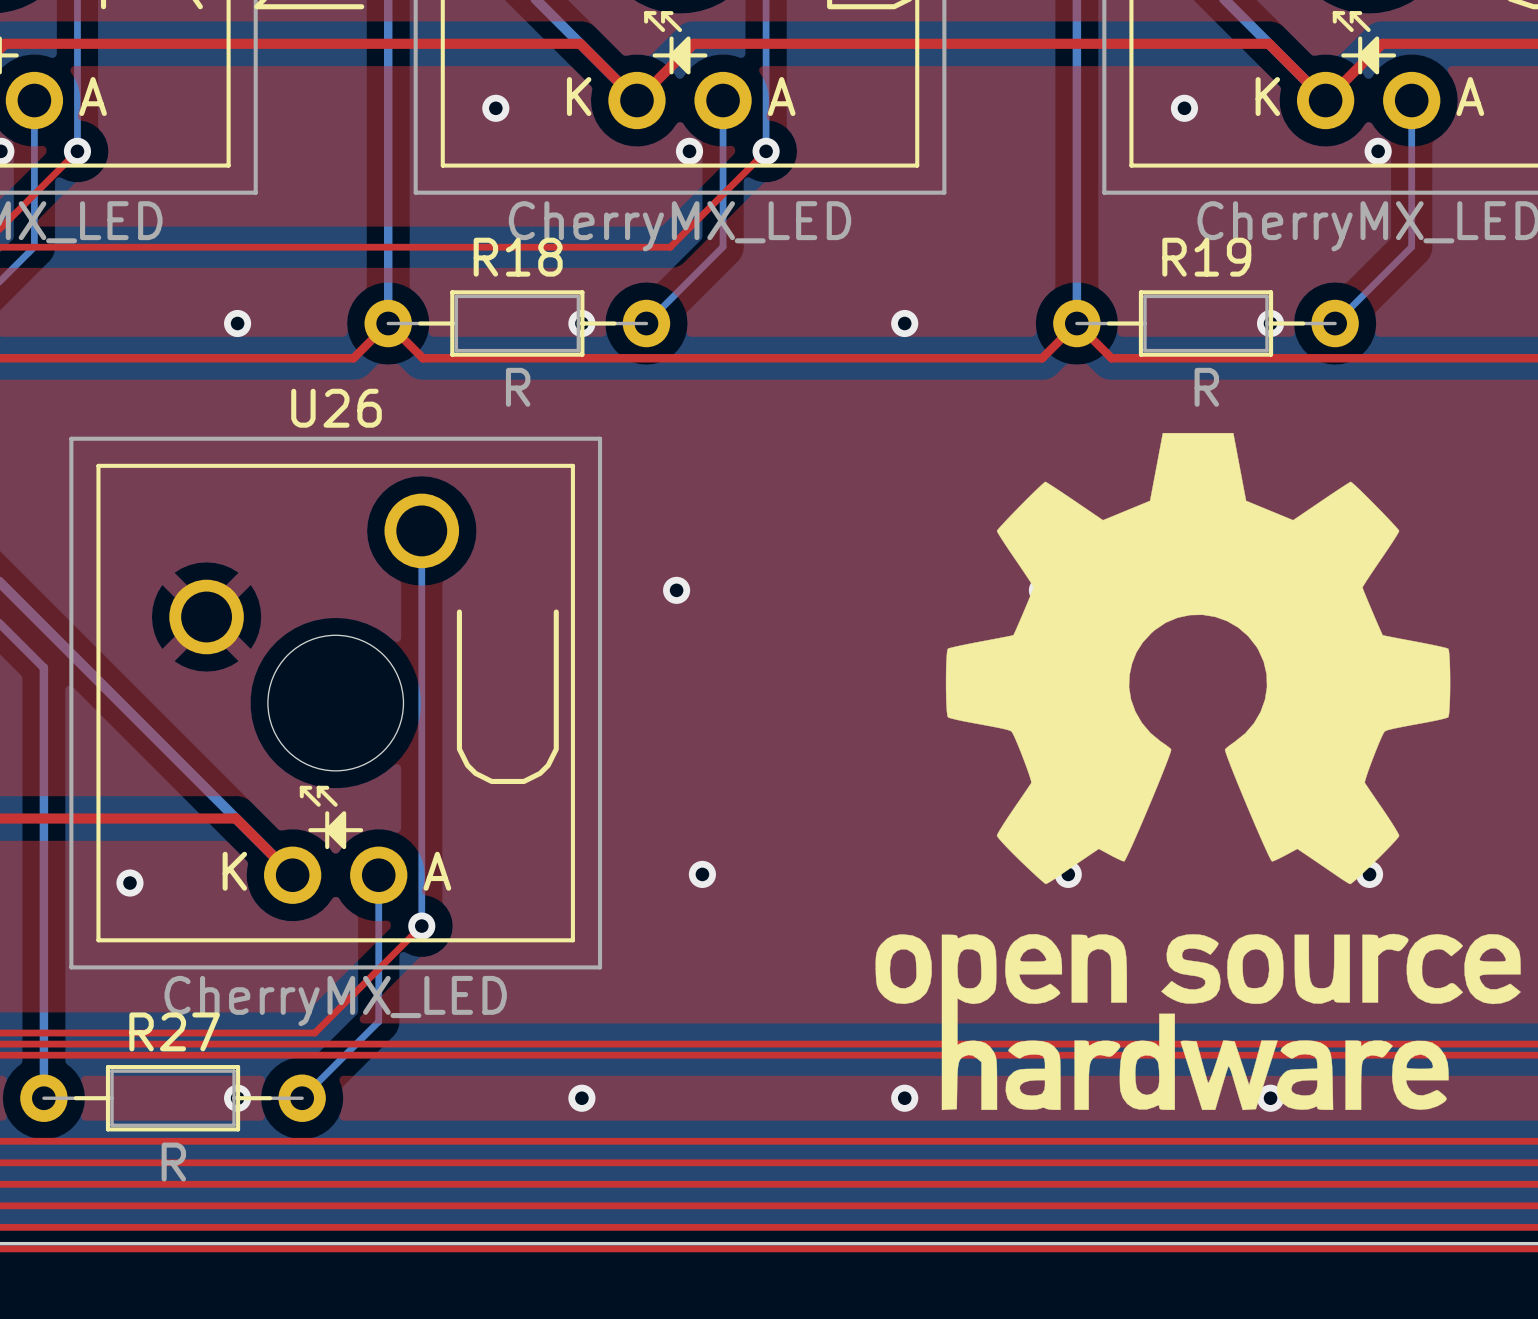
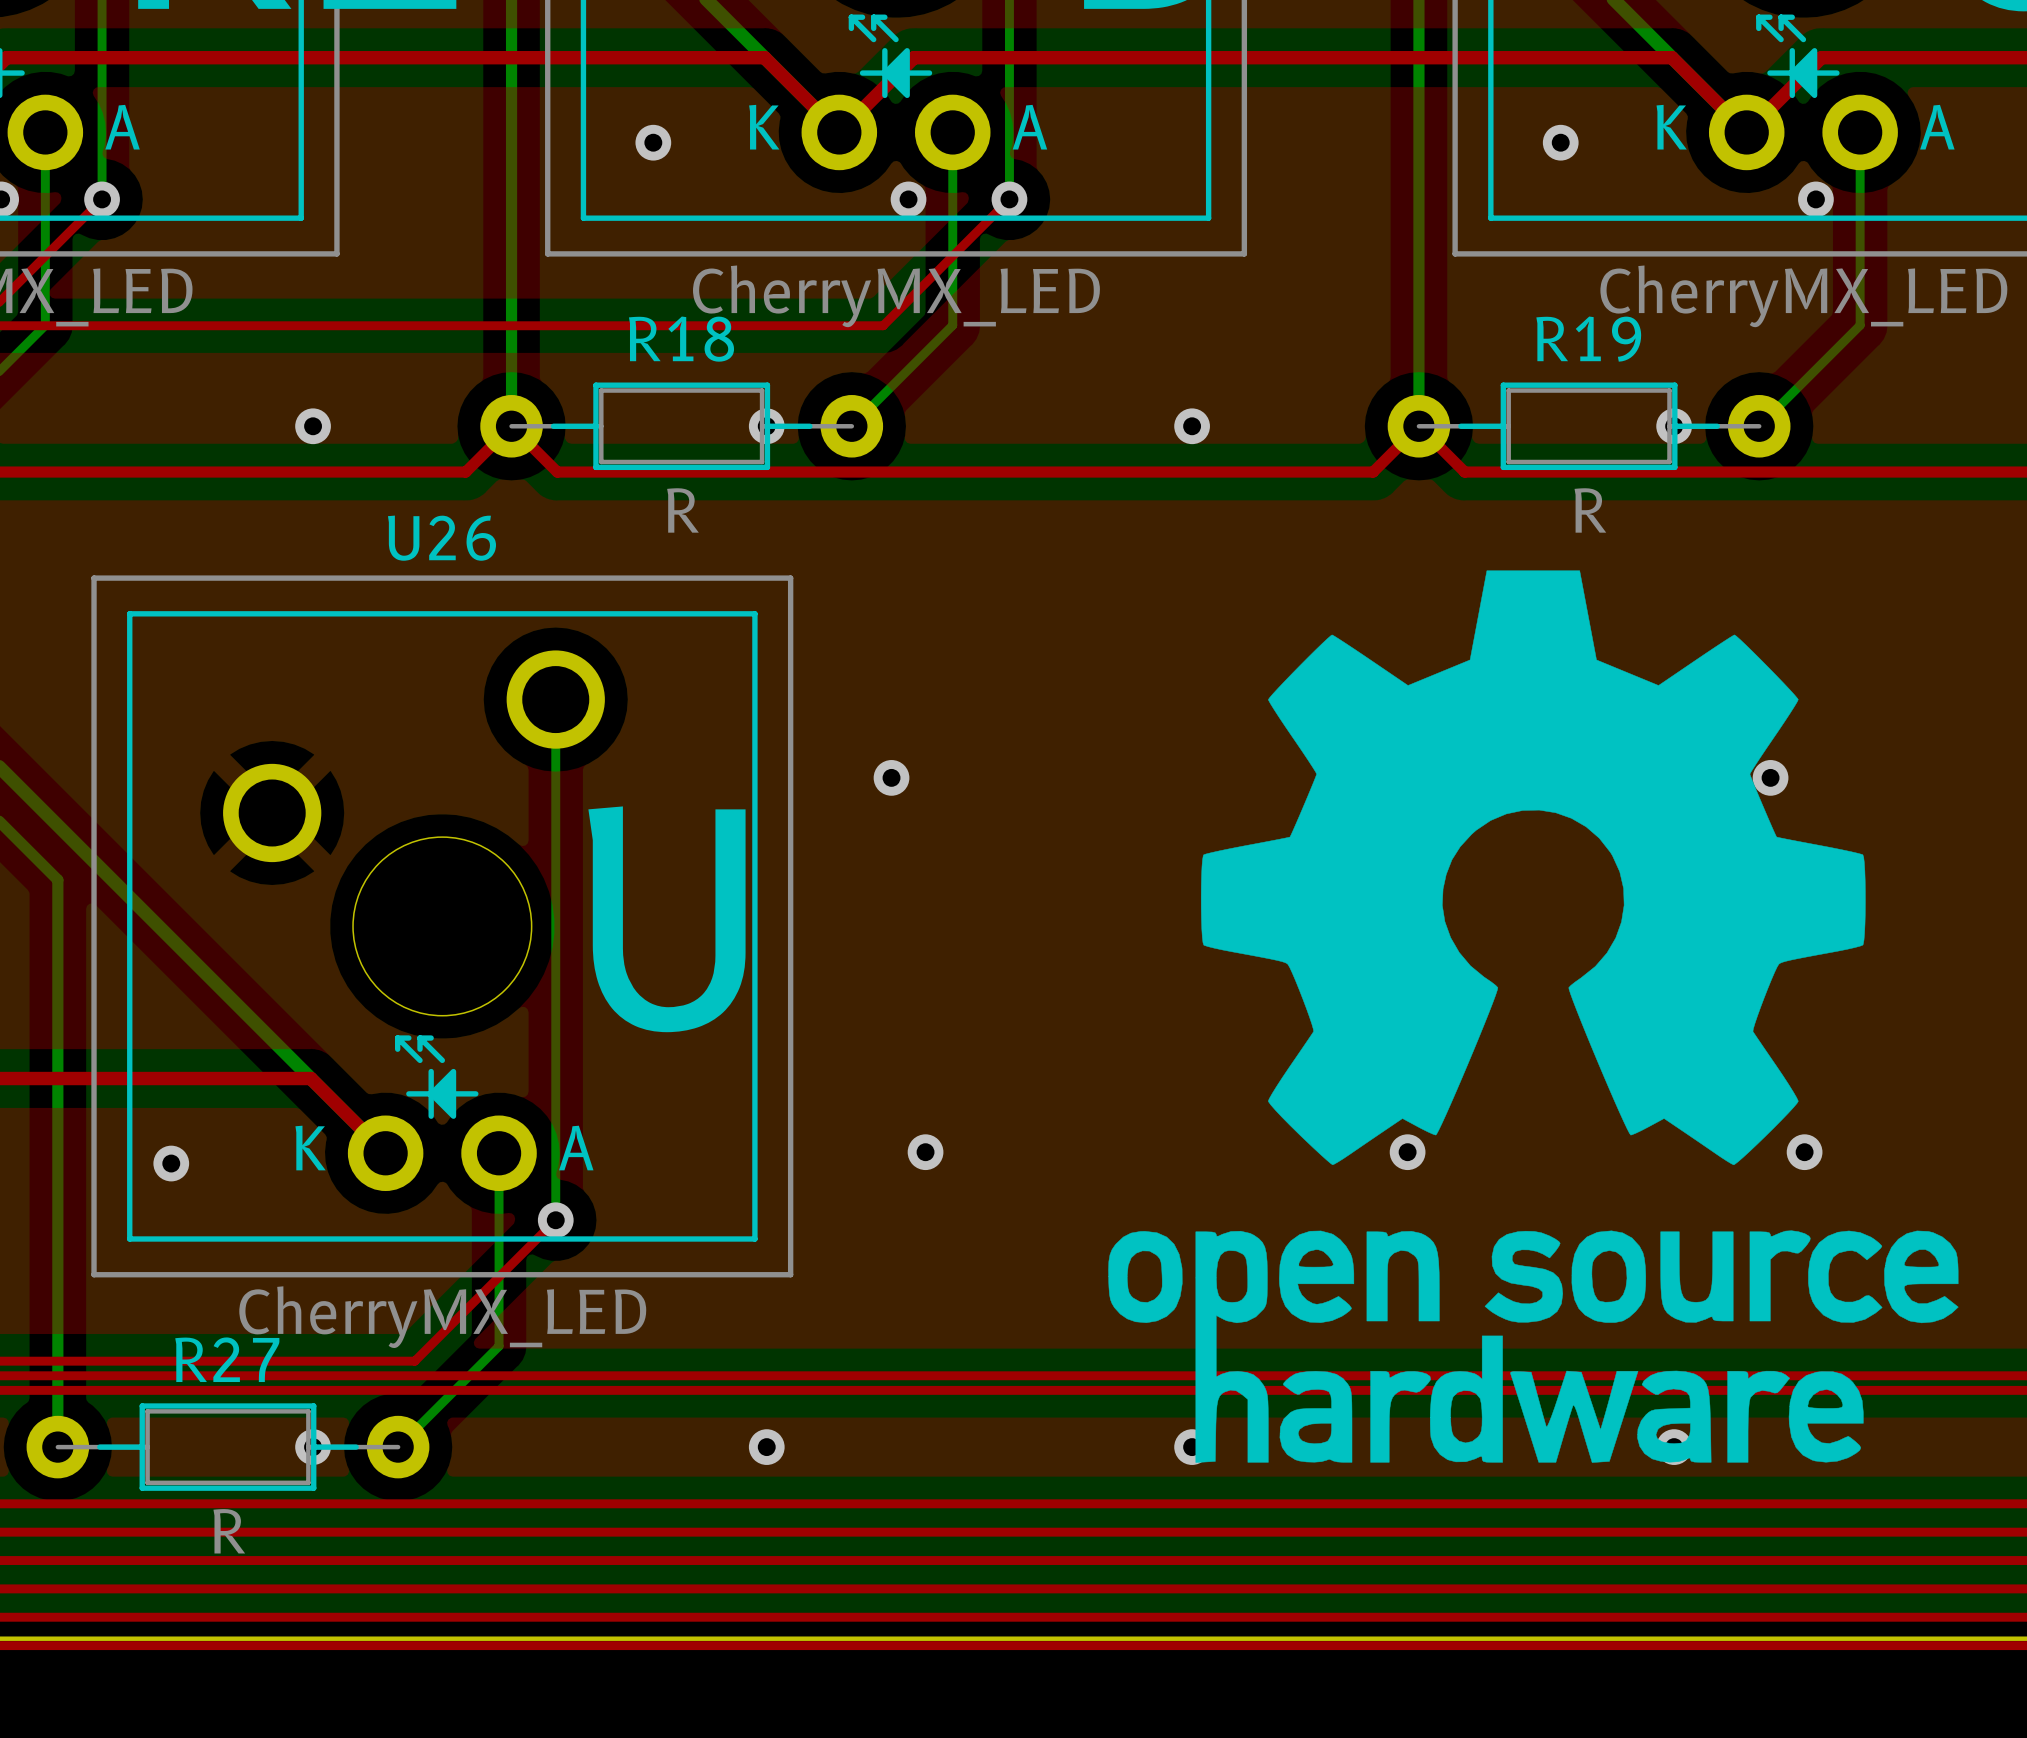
drawing position: (1198, 771) -> (1533, 1016)

